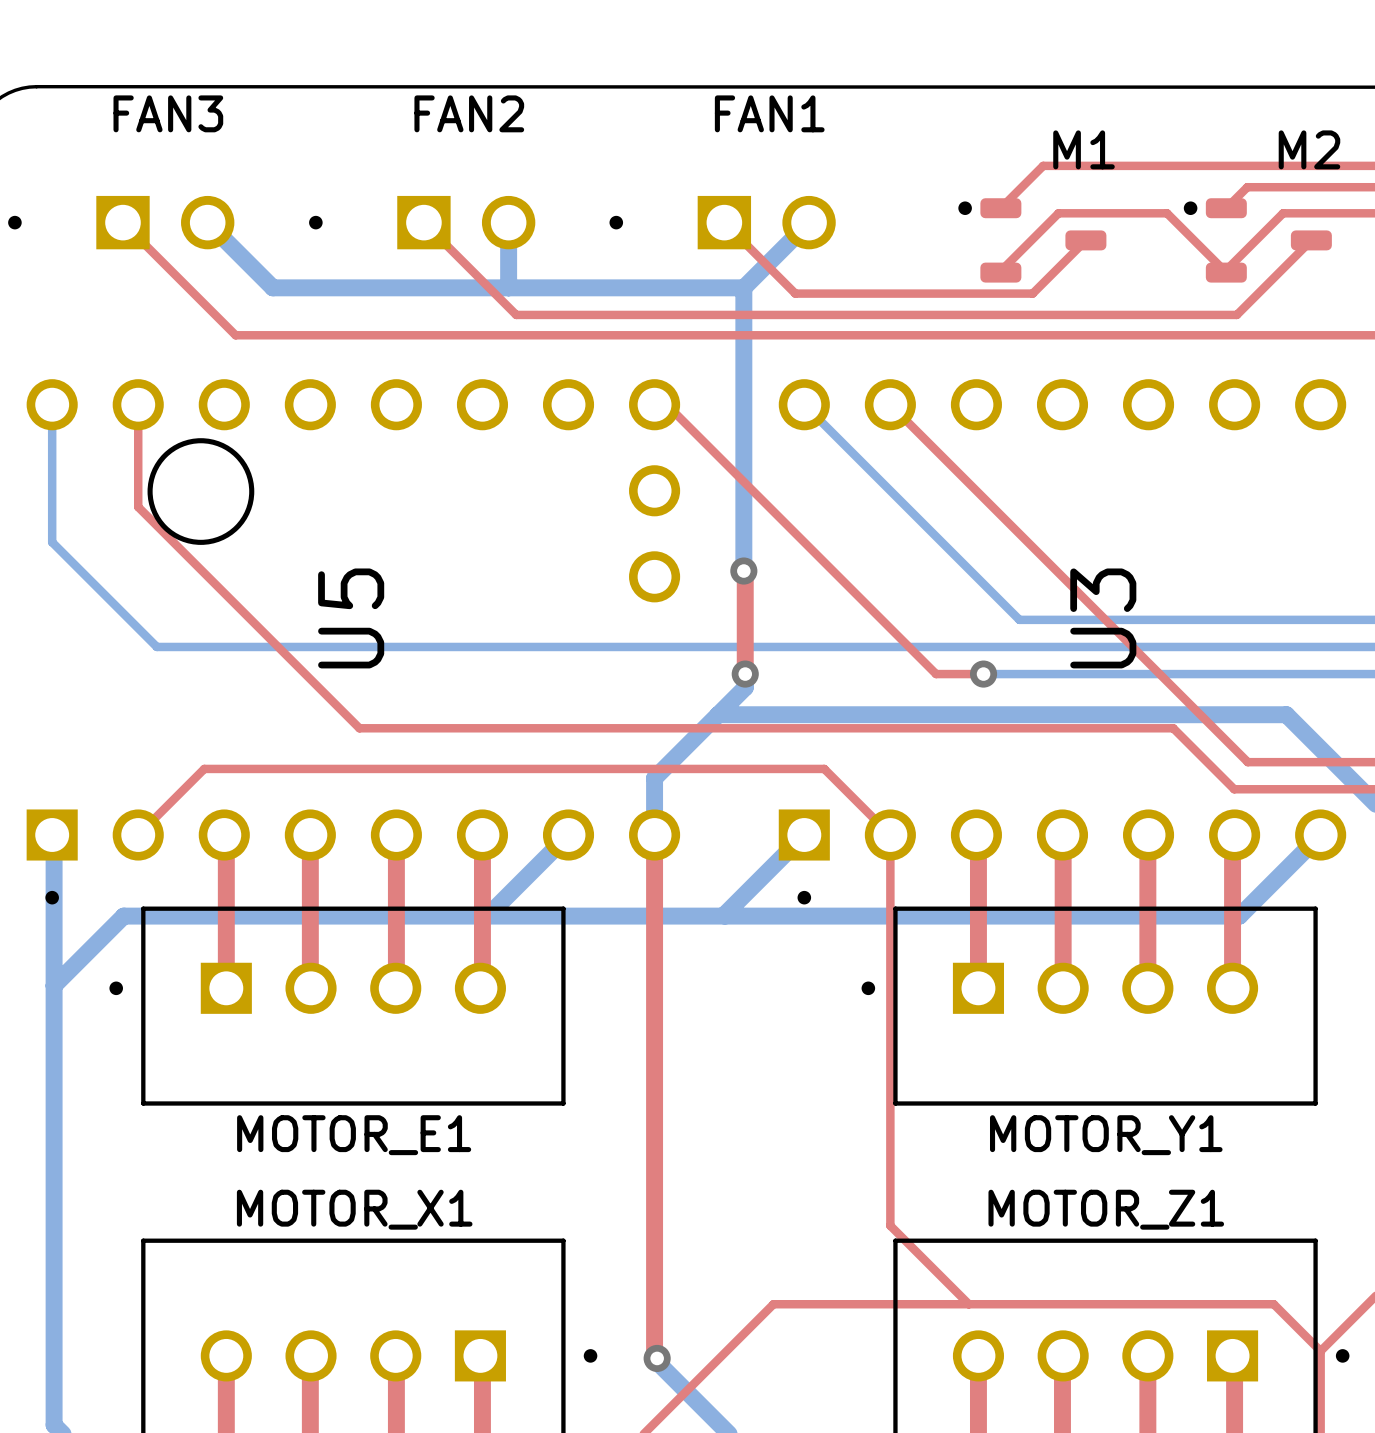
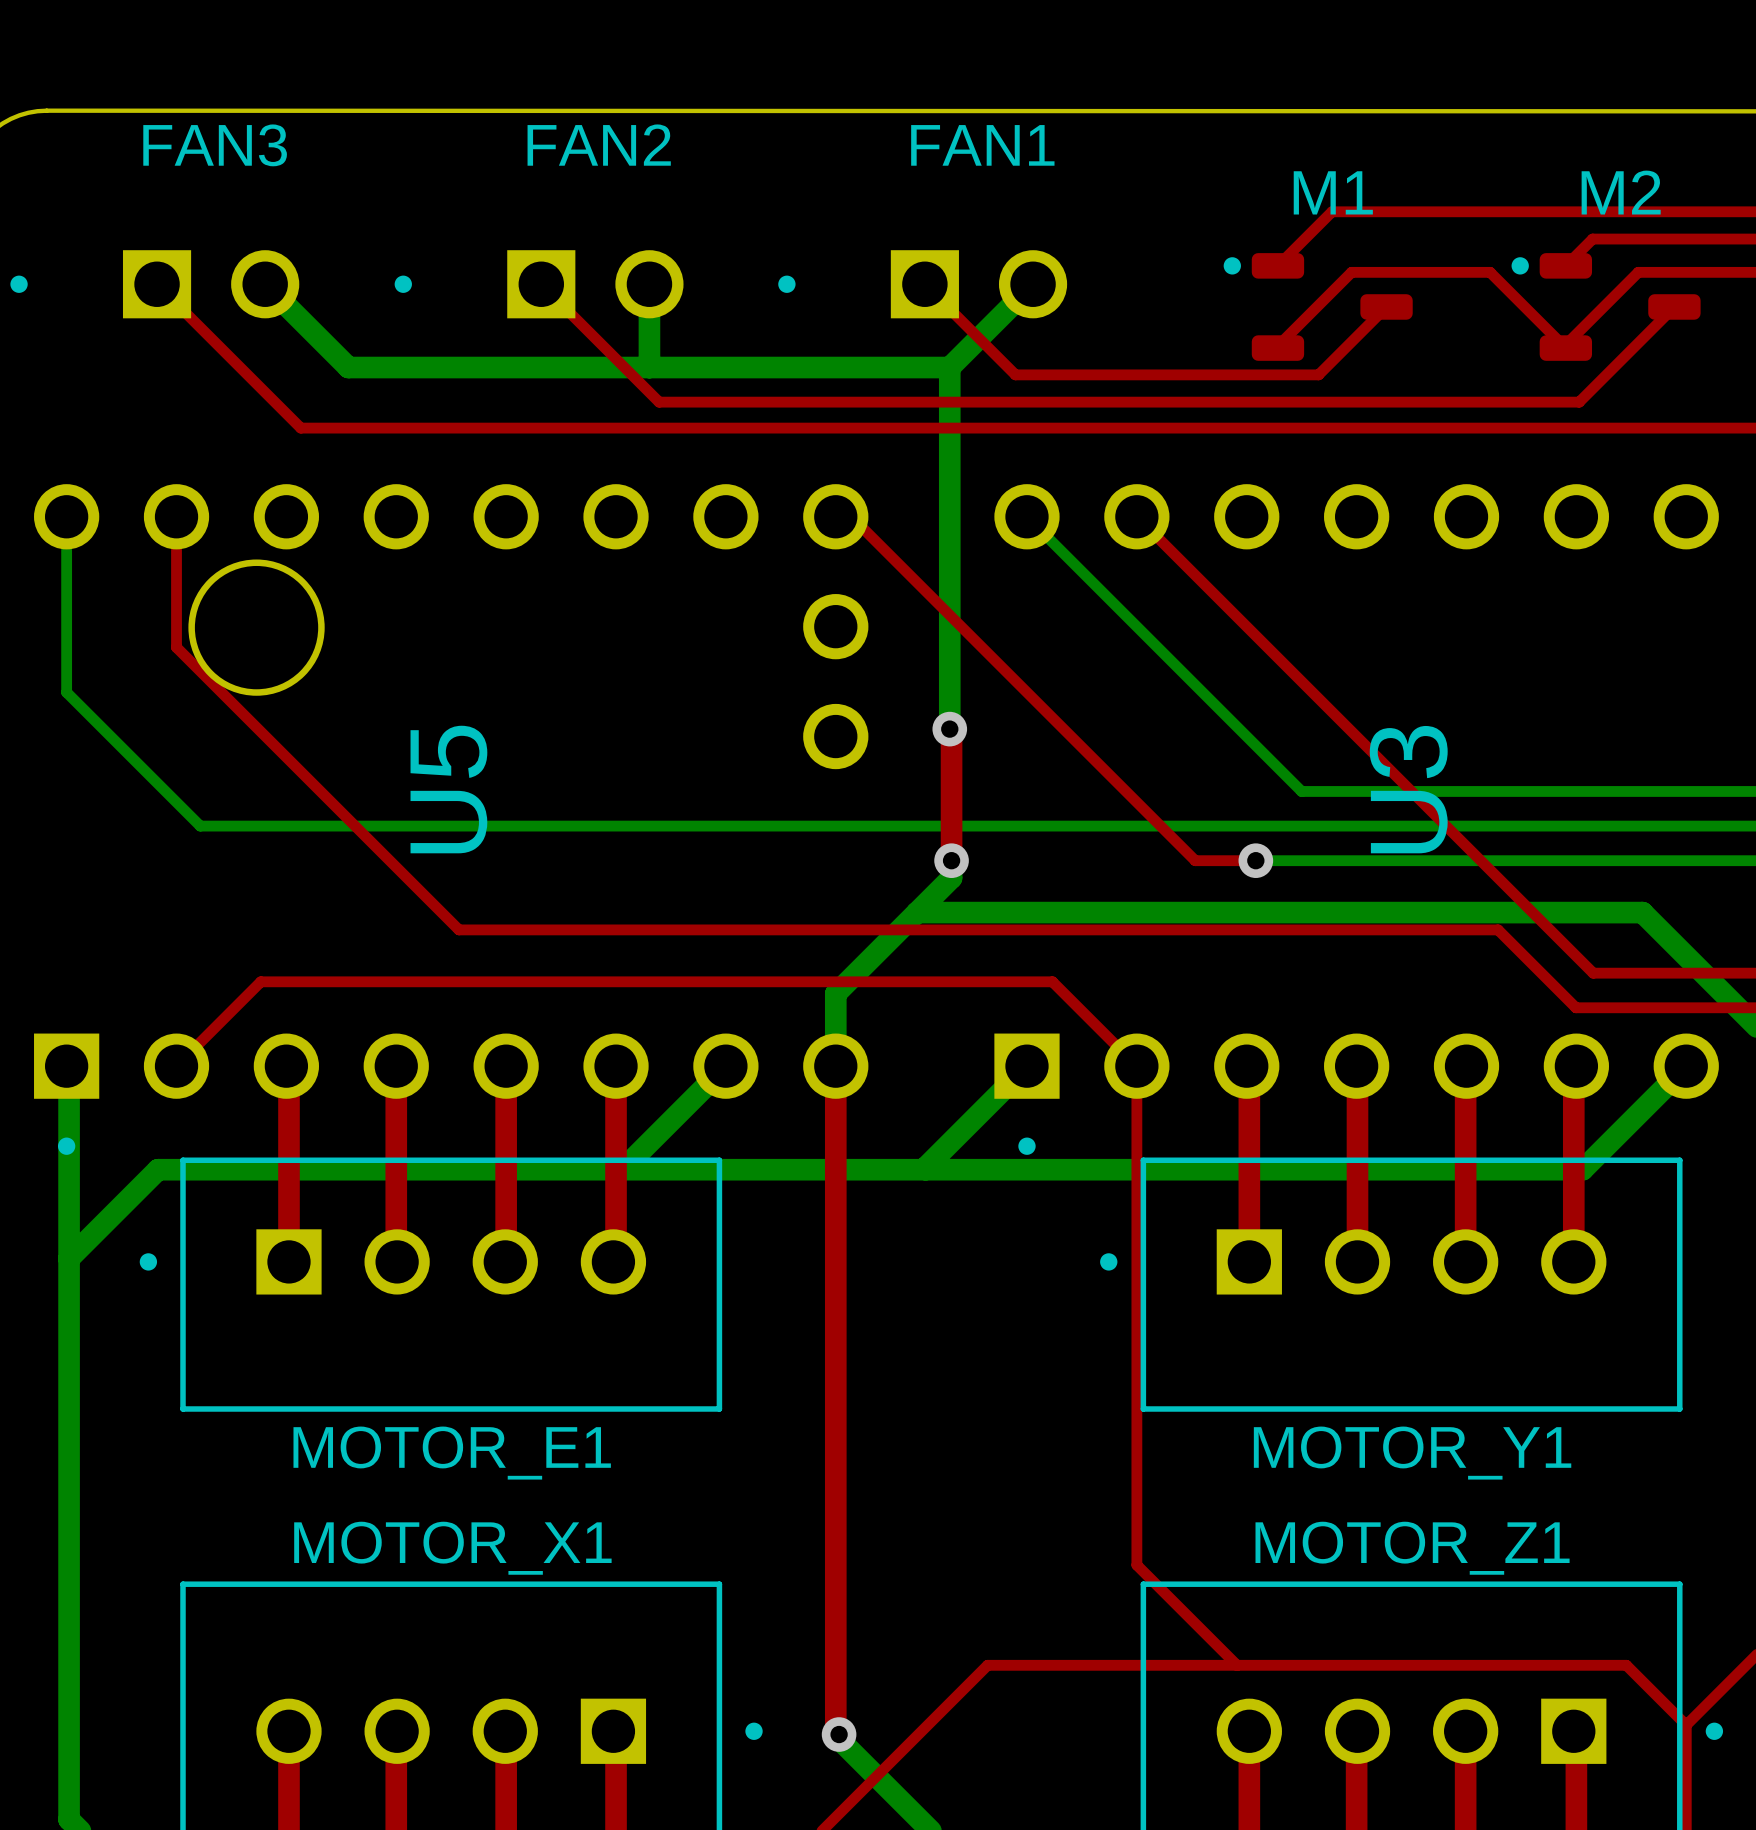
M1 name position: M1 (1084, 149) -> M1 (1333, 192)
M2 name position: M2 (1309, 149) -> M2 (1621, 192)

